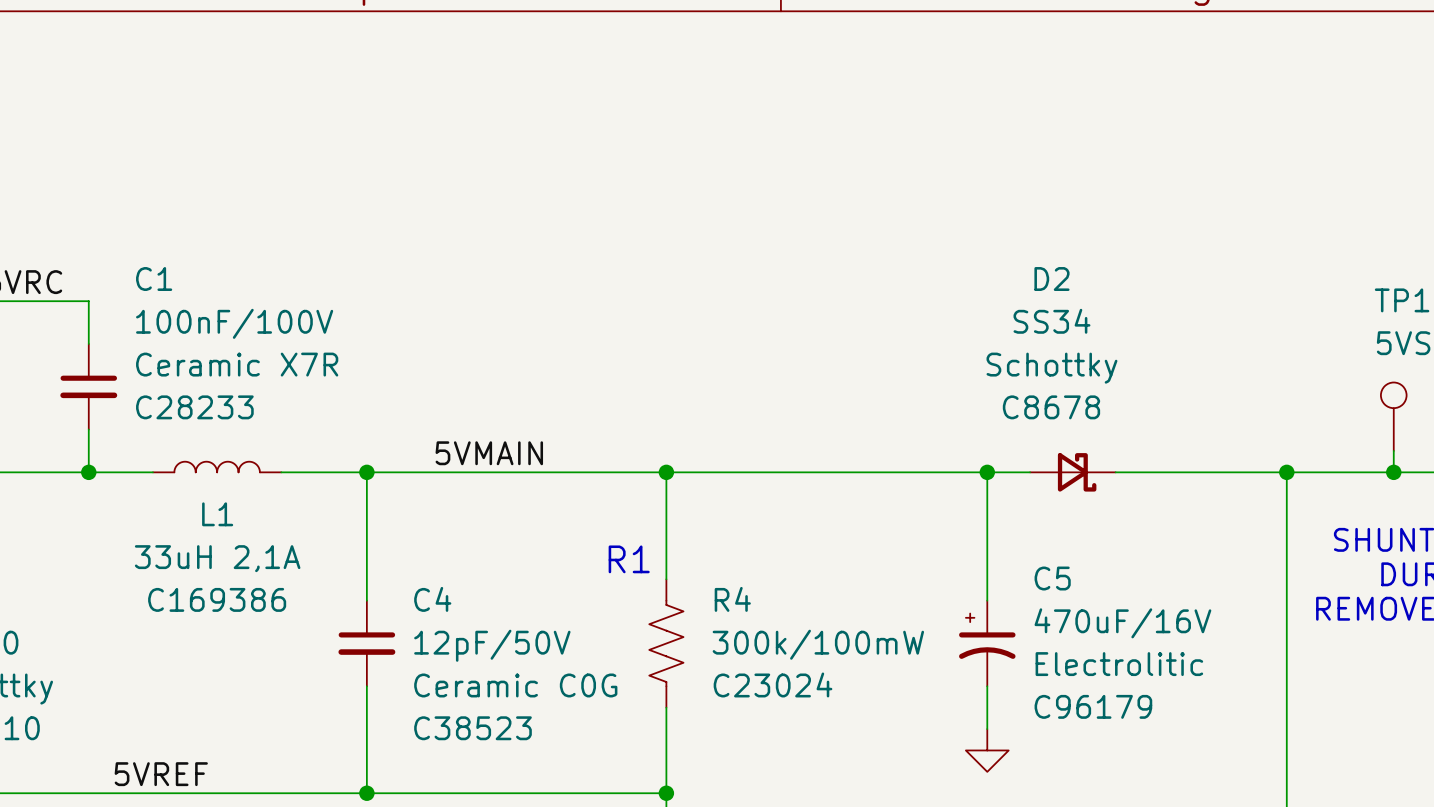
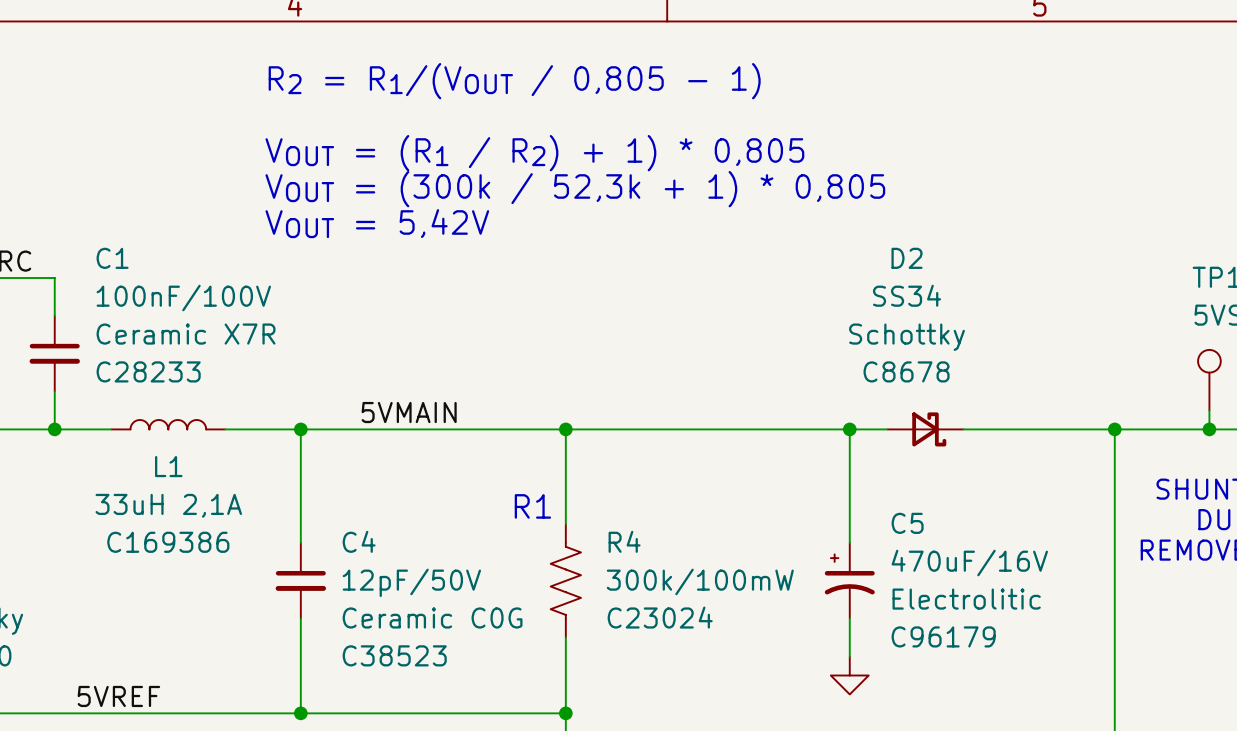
text: none -> R2 = R1/(VOUT / 0,805 - 1) (514, 81)
text: none -> VOUT = (R1 / R2) + 1) * 0,805 (534, 153)
text: none -> VOUT = (300k / 52,3k + 1) * 0,805 (575, 189)
text: none -> VOUT = 5,42V (377, 223)

